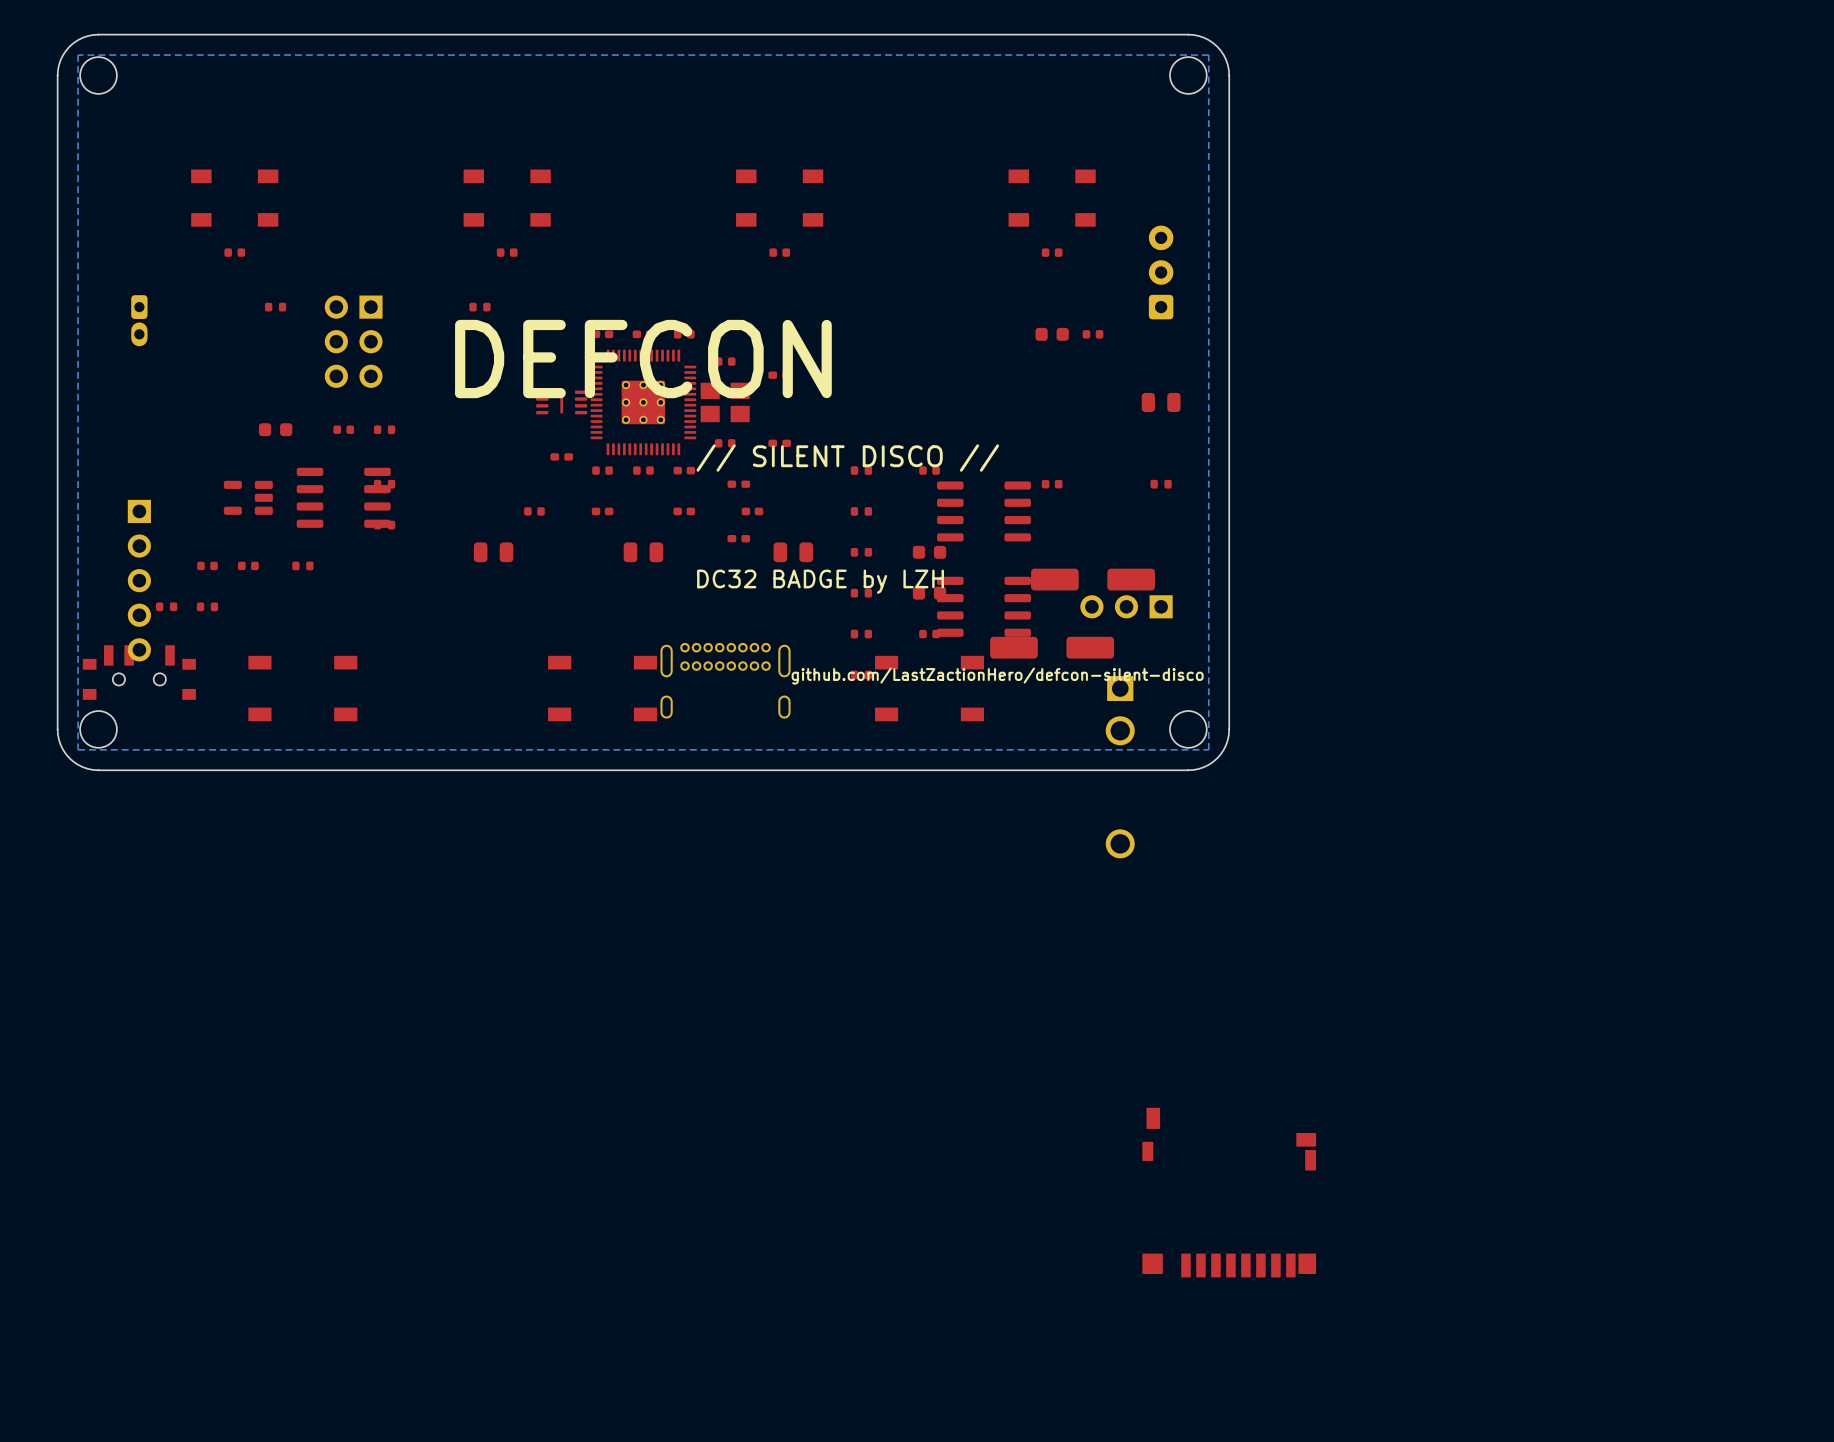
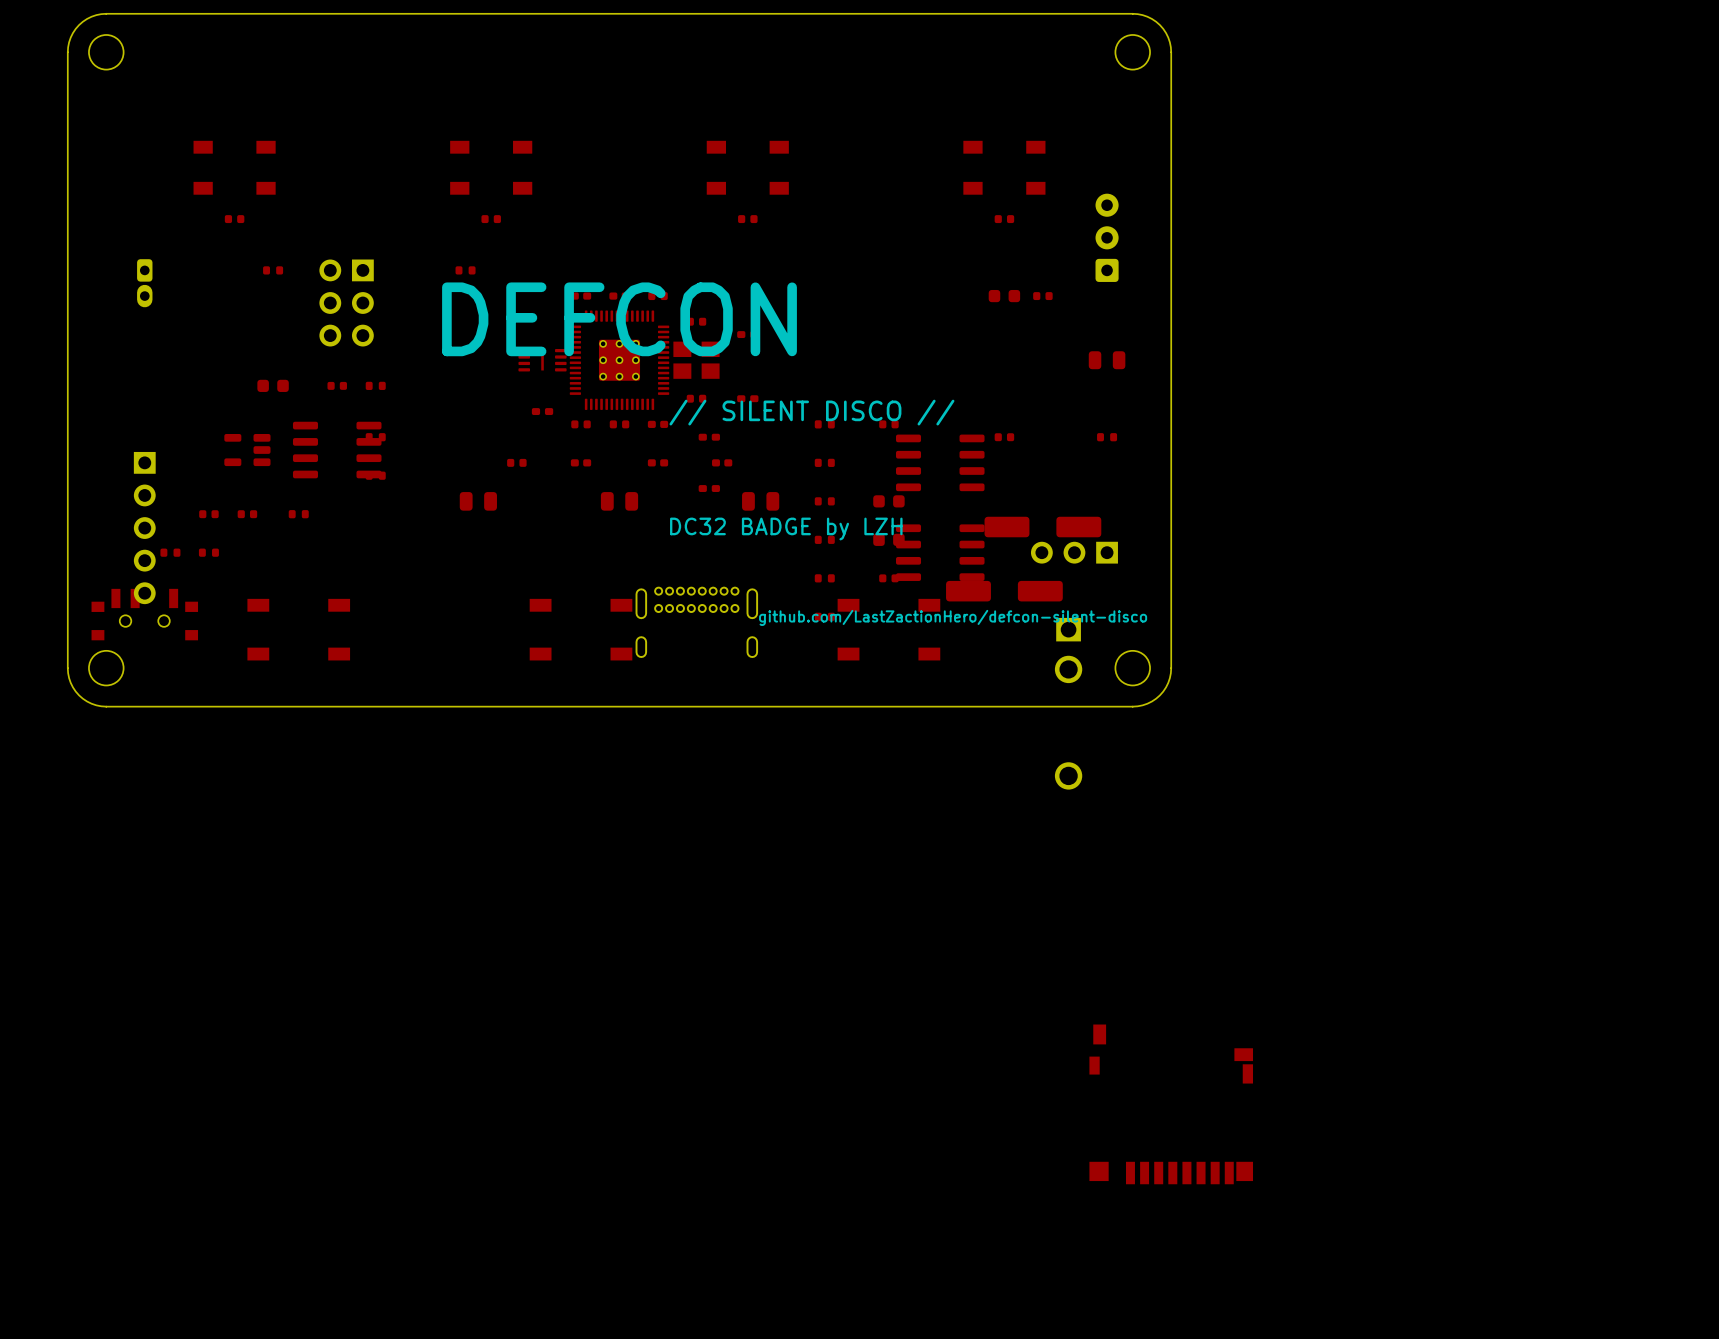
bottom zone outline: (1208, 55) (78, 55) (78, 749) (1208, 749) (1208, 55) -> none

